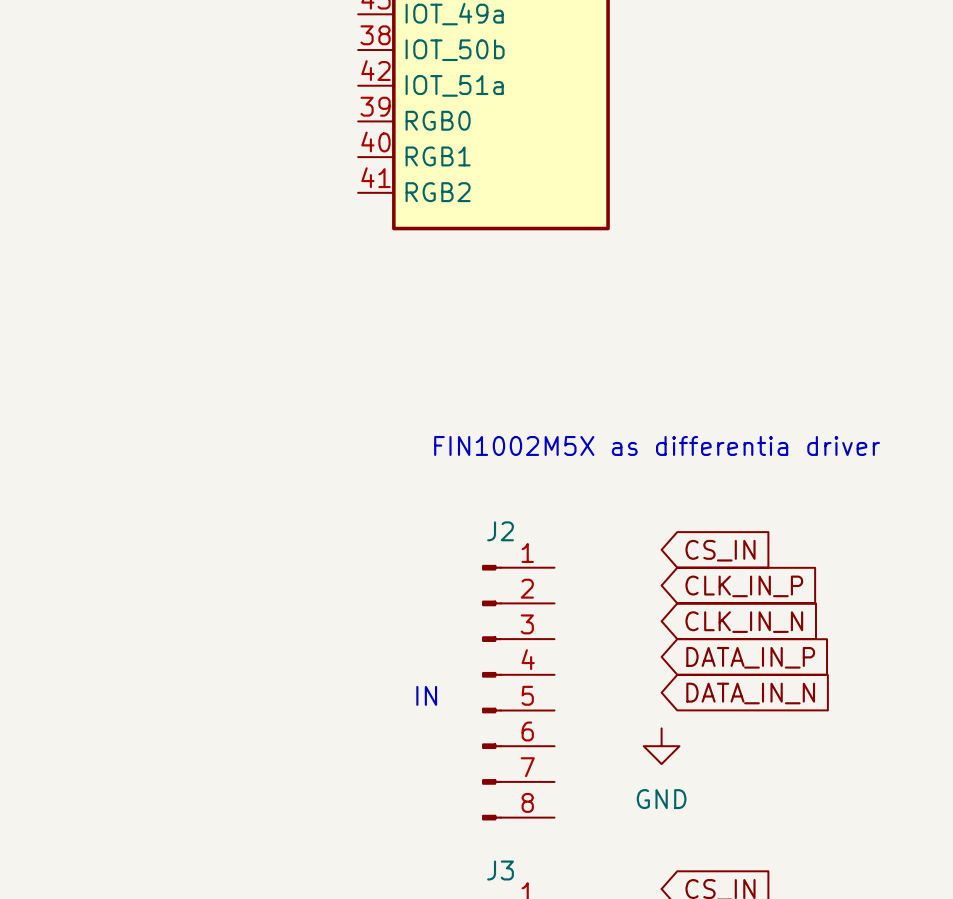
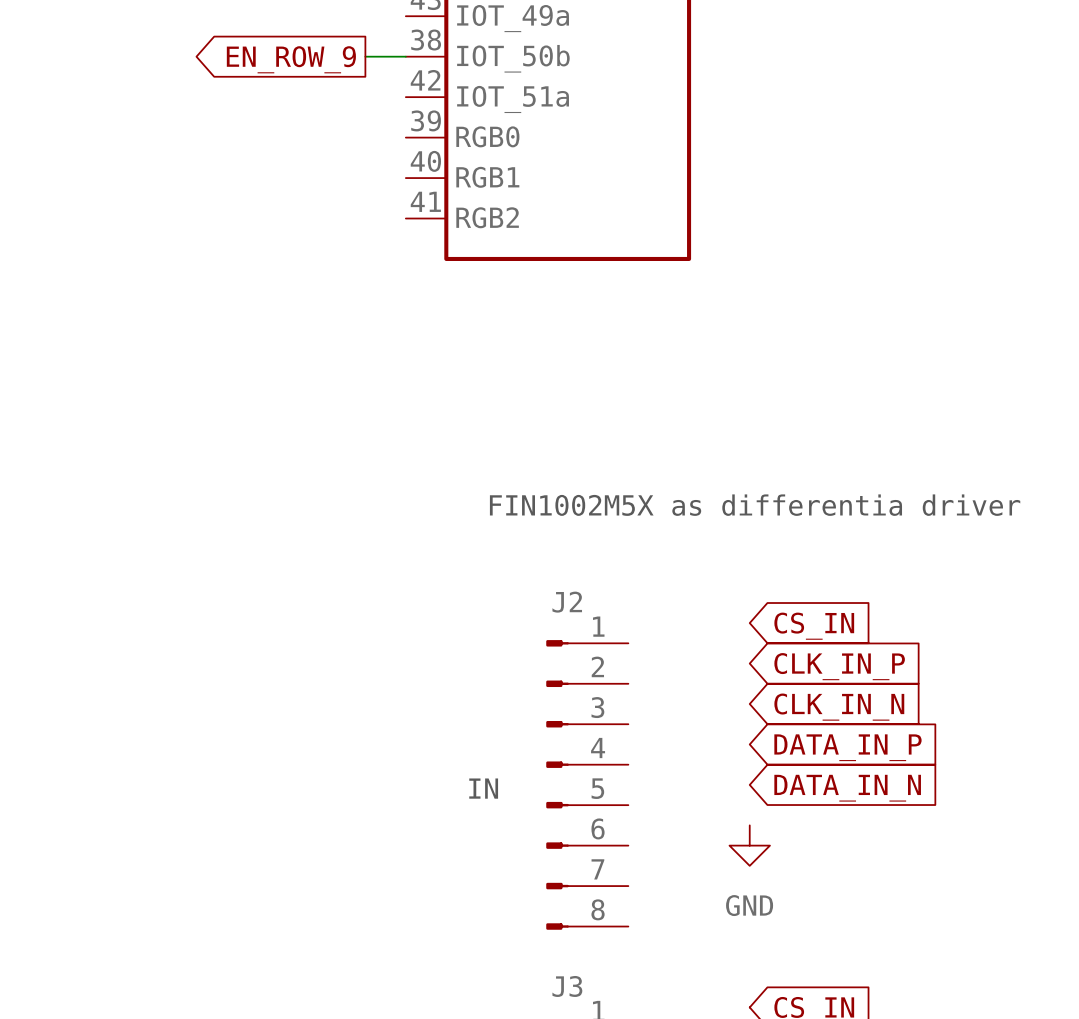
global label: none -> EN_ROW_9 (291, 59)
wire: none -> (365, 56) (405, 56)

